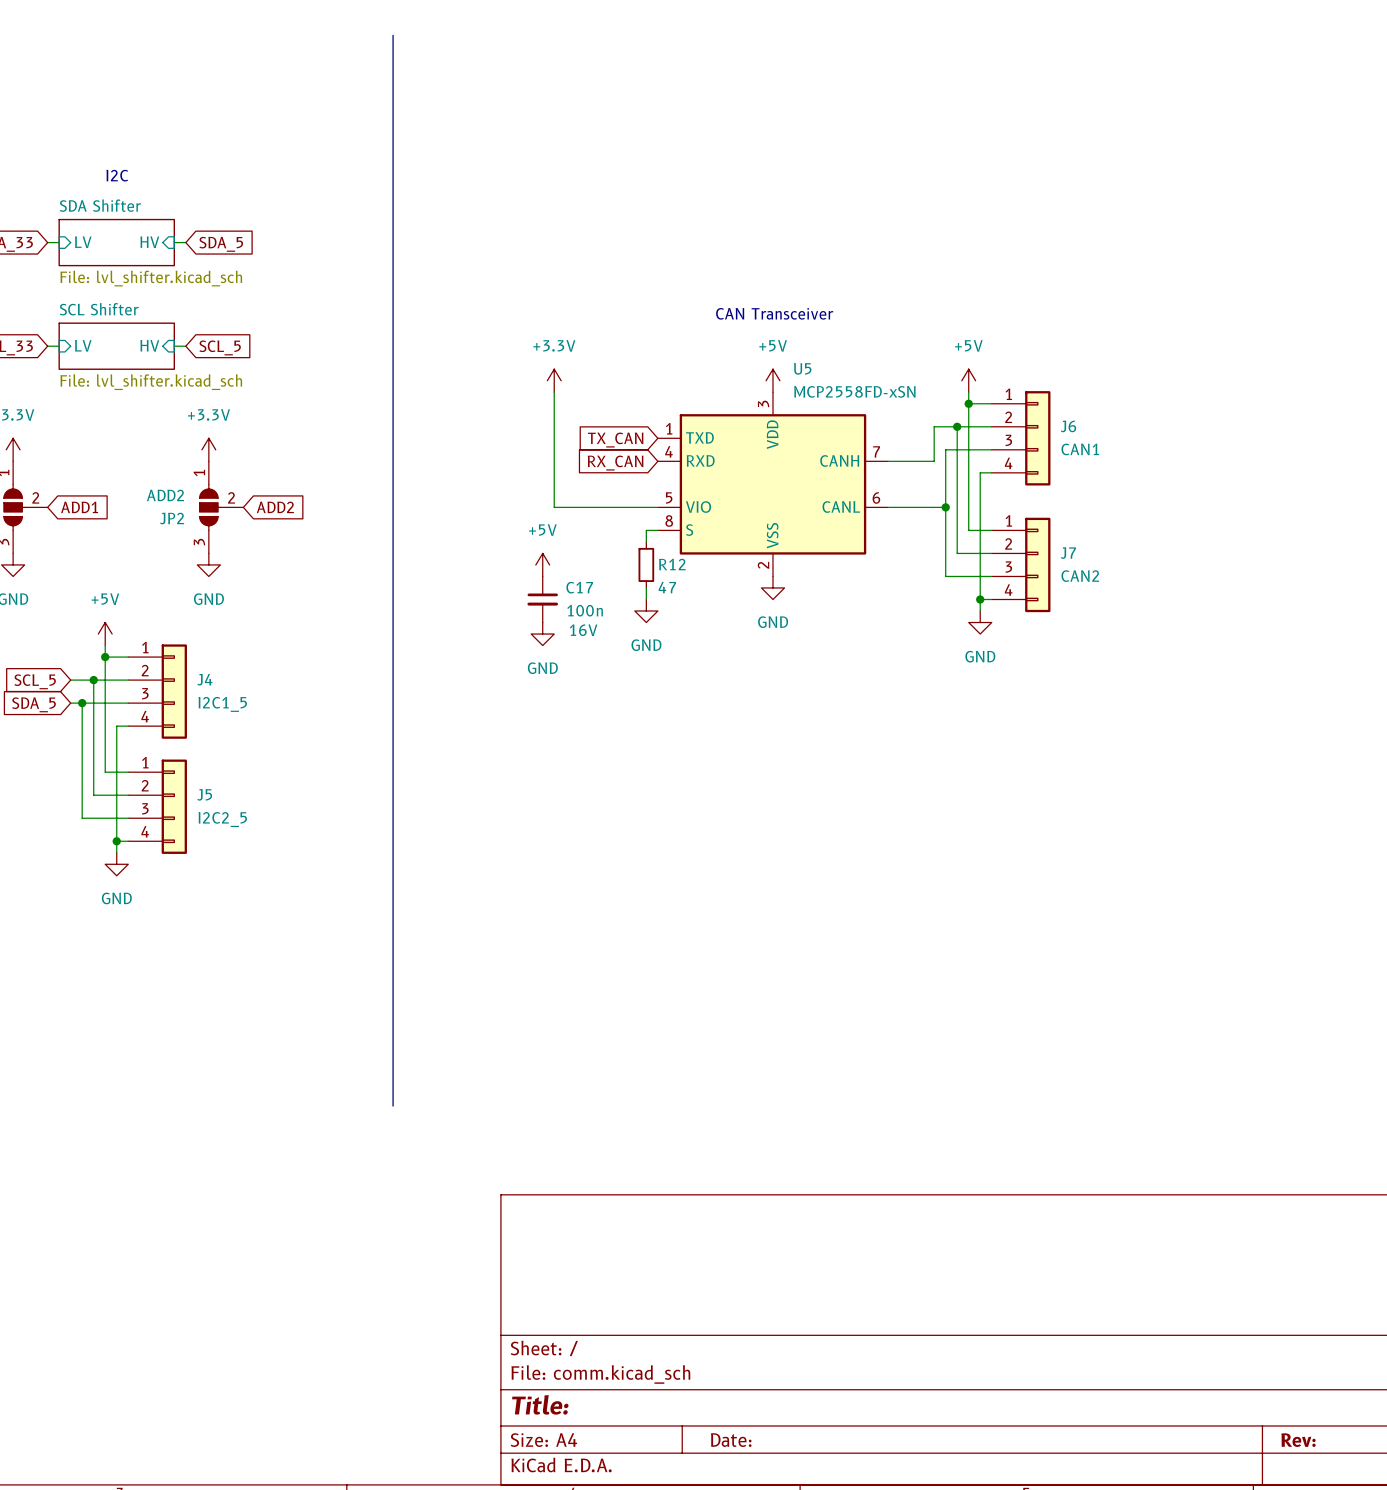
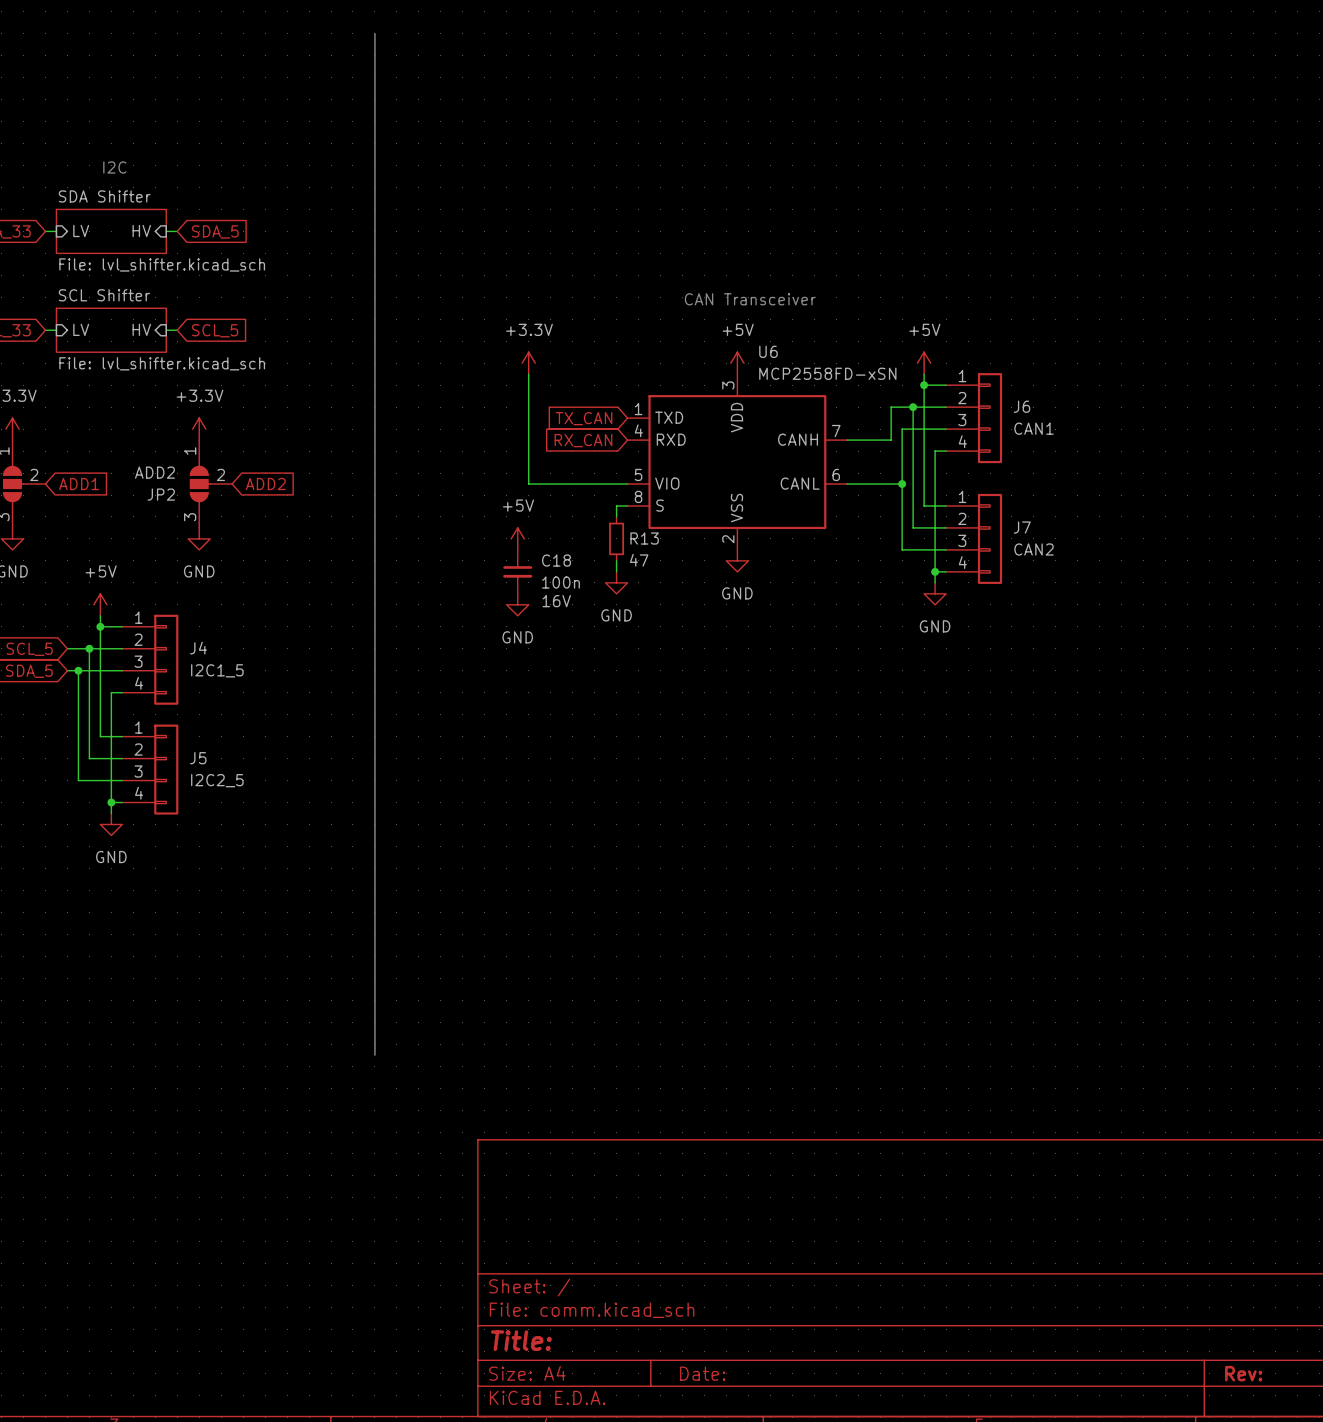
U5 name: U5 (802, 368) -> U6 (768, 351)
R12 name: R12 (672, 564) -> R13 (644, 538)
C17 name: C17 (579, 587) -> C18 (556, 560)

